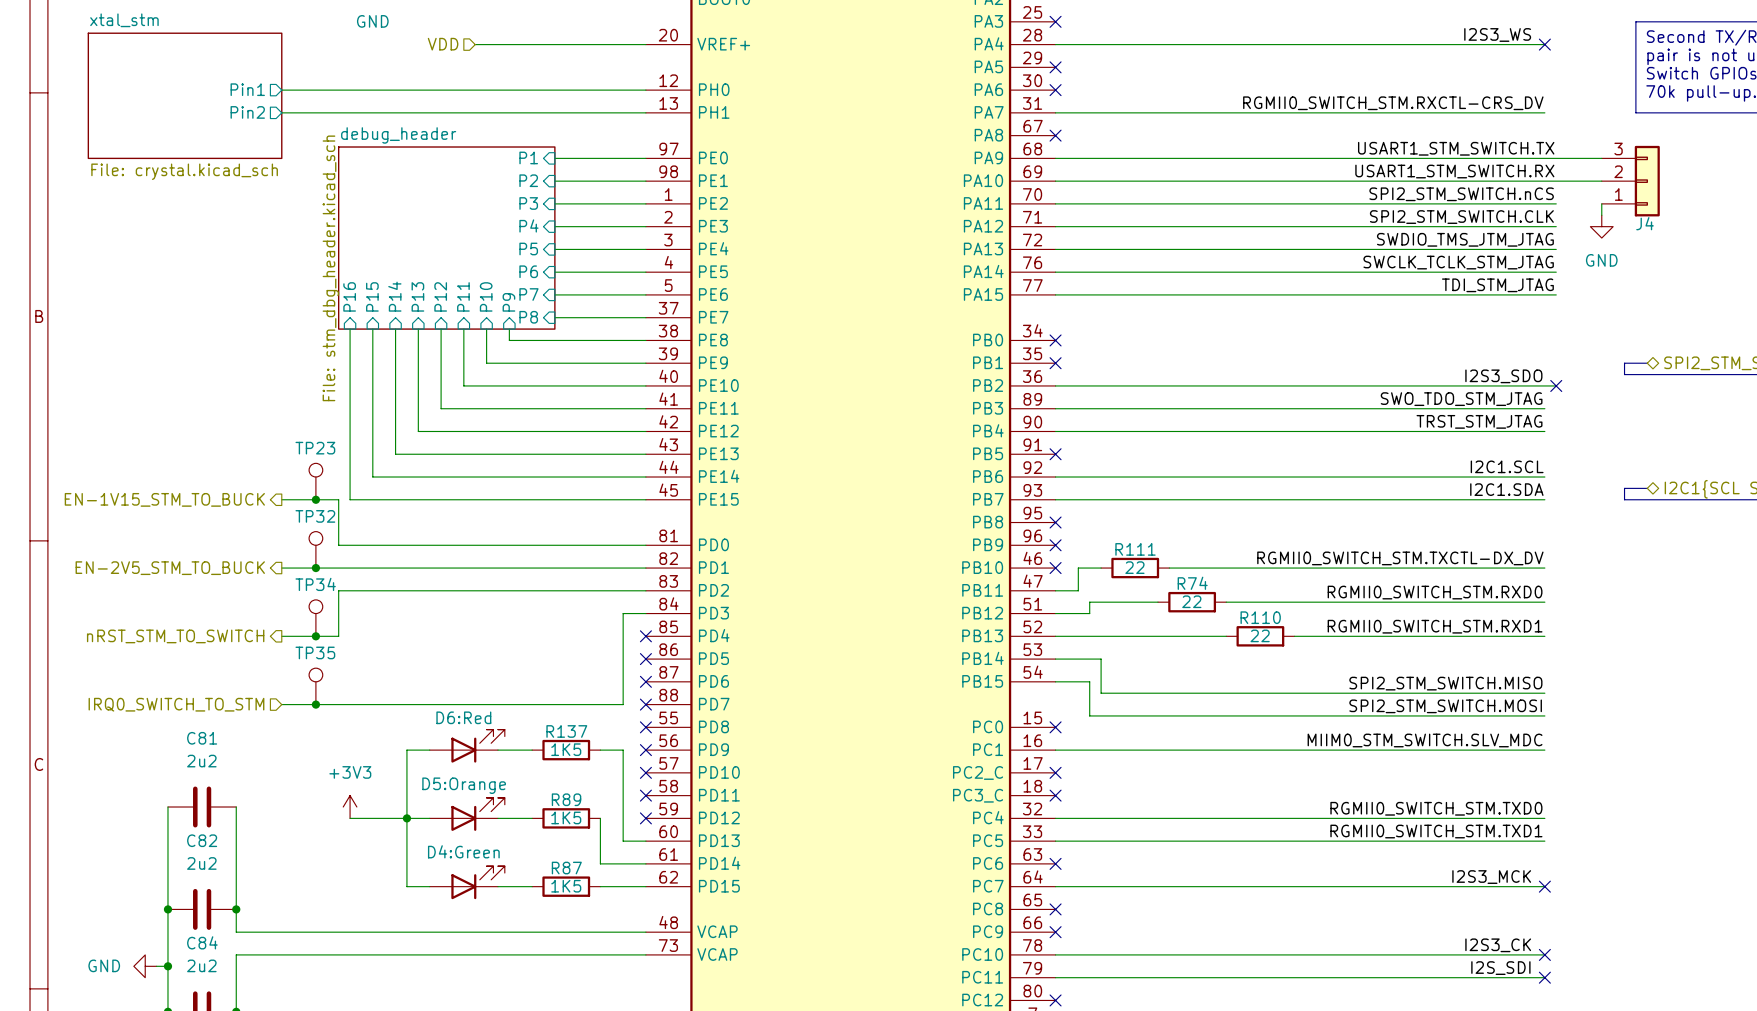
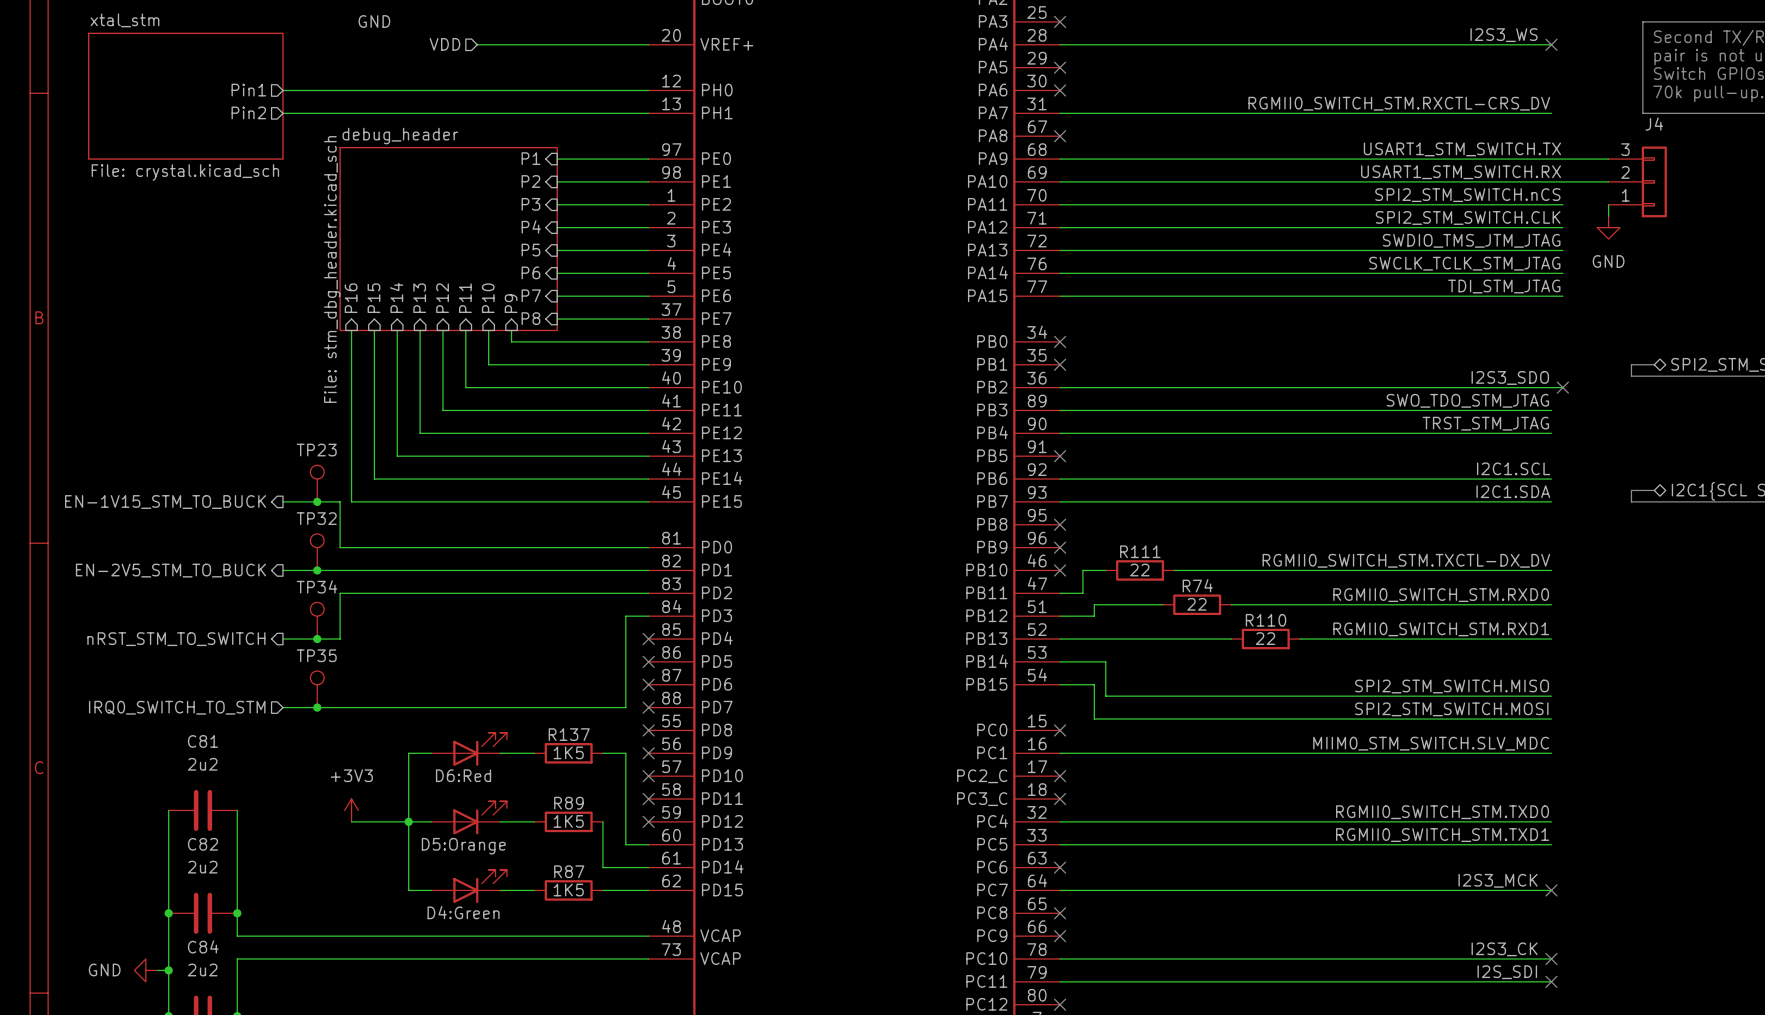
J4 name position: J4 (1645, 223) -> J4 (1654, 124)
part text position: D6:Red (463, 717) -> D6:Red (463, 775)
part text position: D5:Orange (464, 785) -> D5:Orange (463, 846)
part text position: D4:Green (463, 851) -> D4:Green (463, 912)

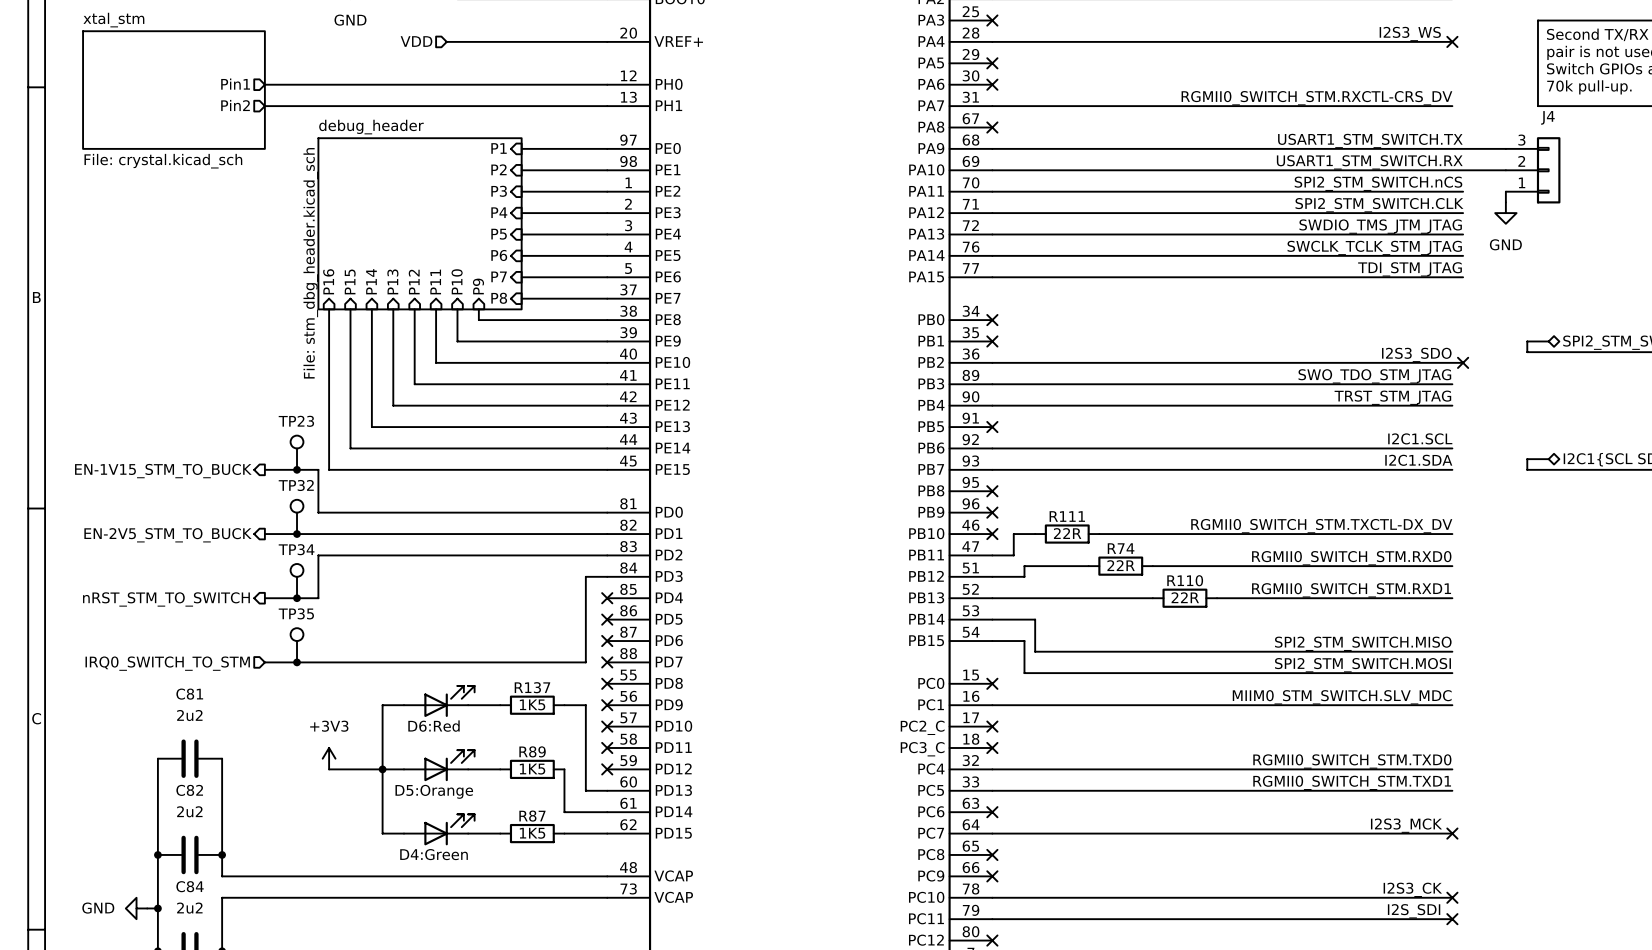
R111 value: 22 (1139, 570) -> 22R (1067, 533)
R74 value: 22 (1196, 604) -> 22R (1121, 565)
R110 value: 22 (1265, 638) -> 22R (1185, 597)

